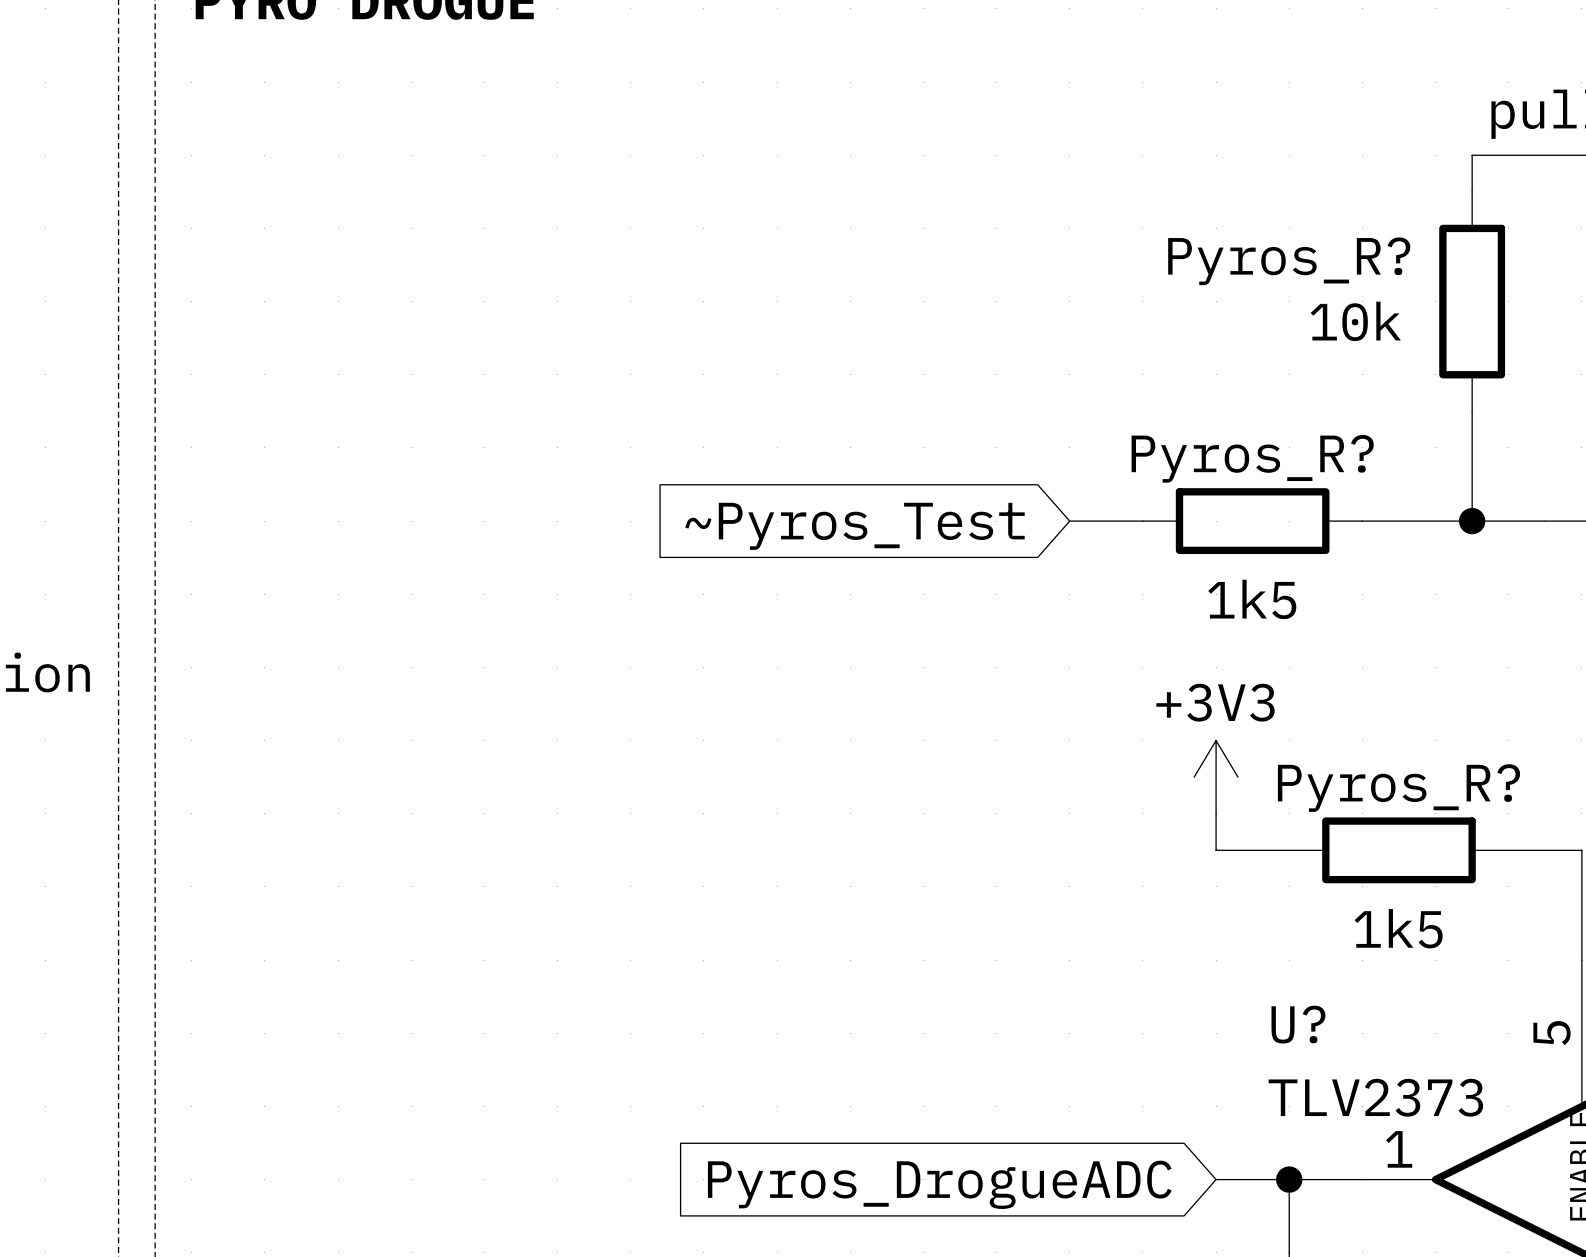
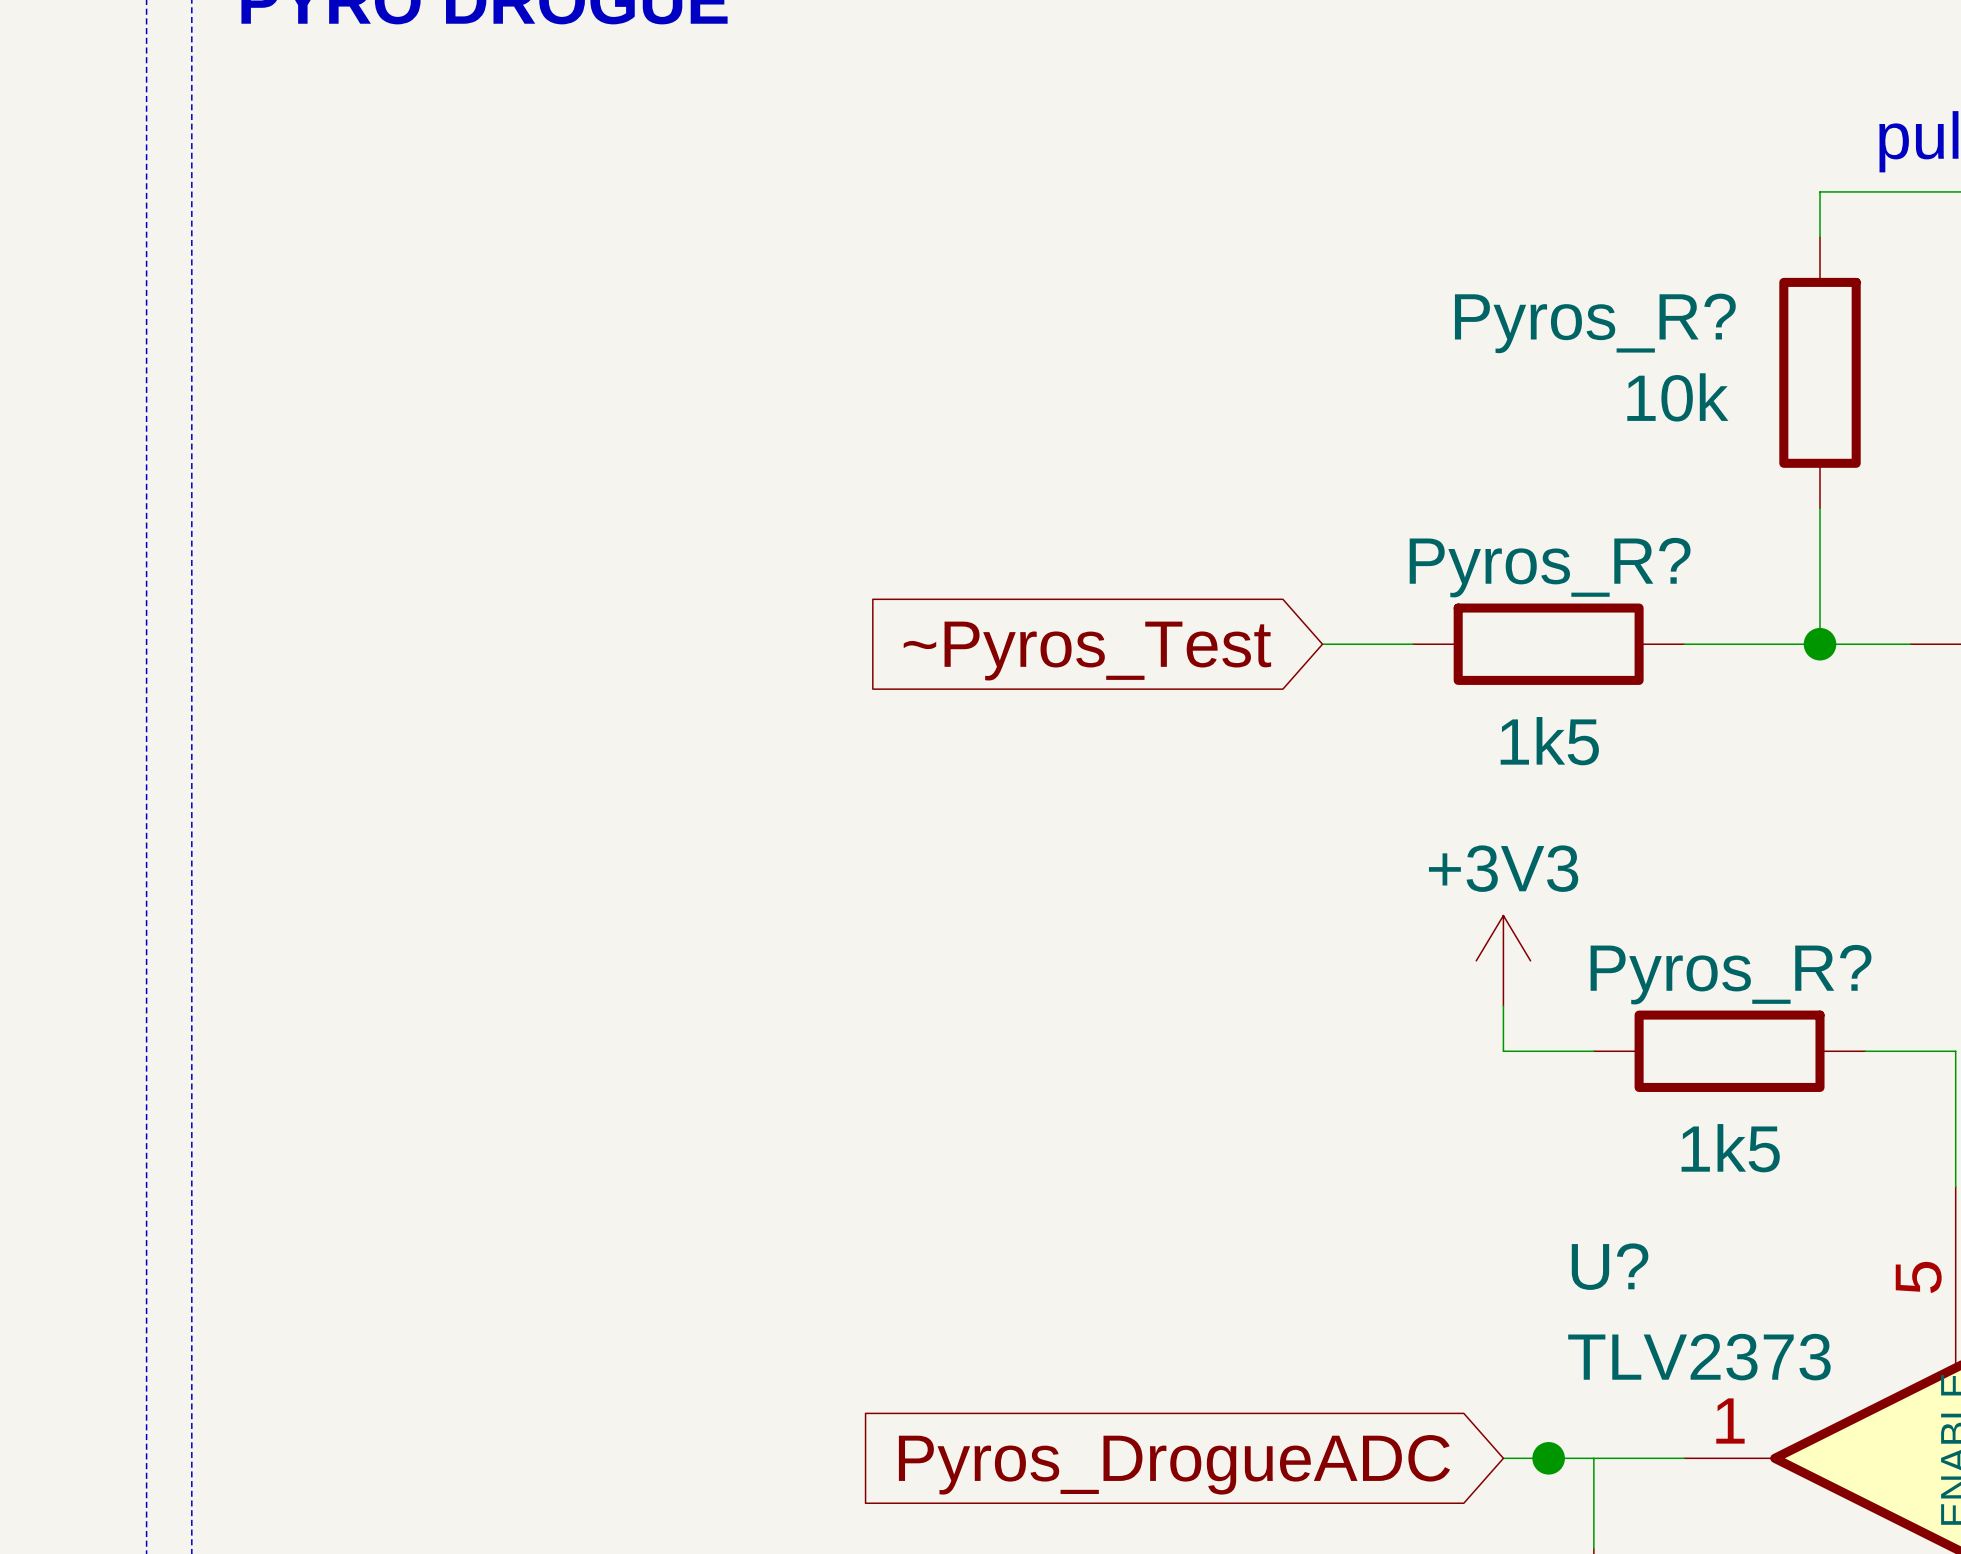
junction position: (1289, 1179) -> (1548, 1458)

